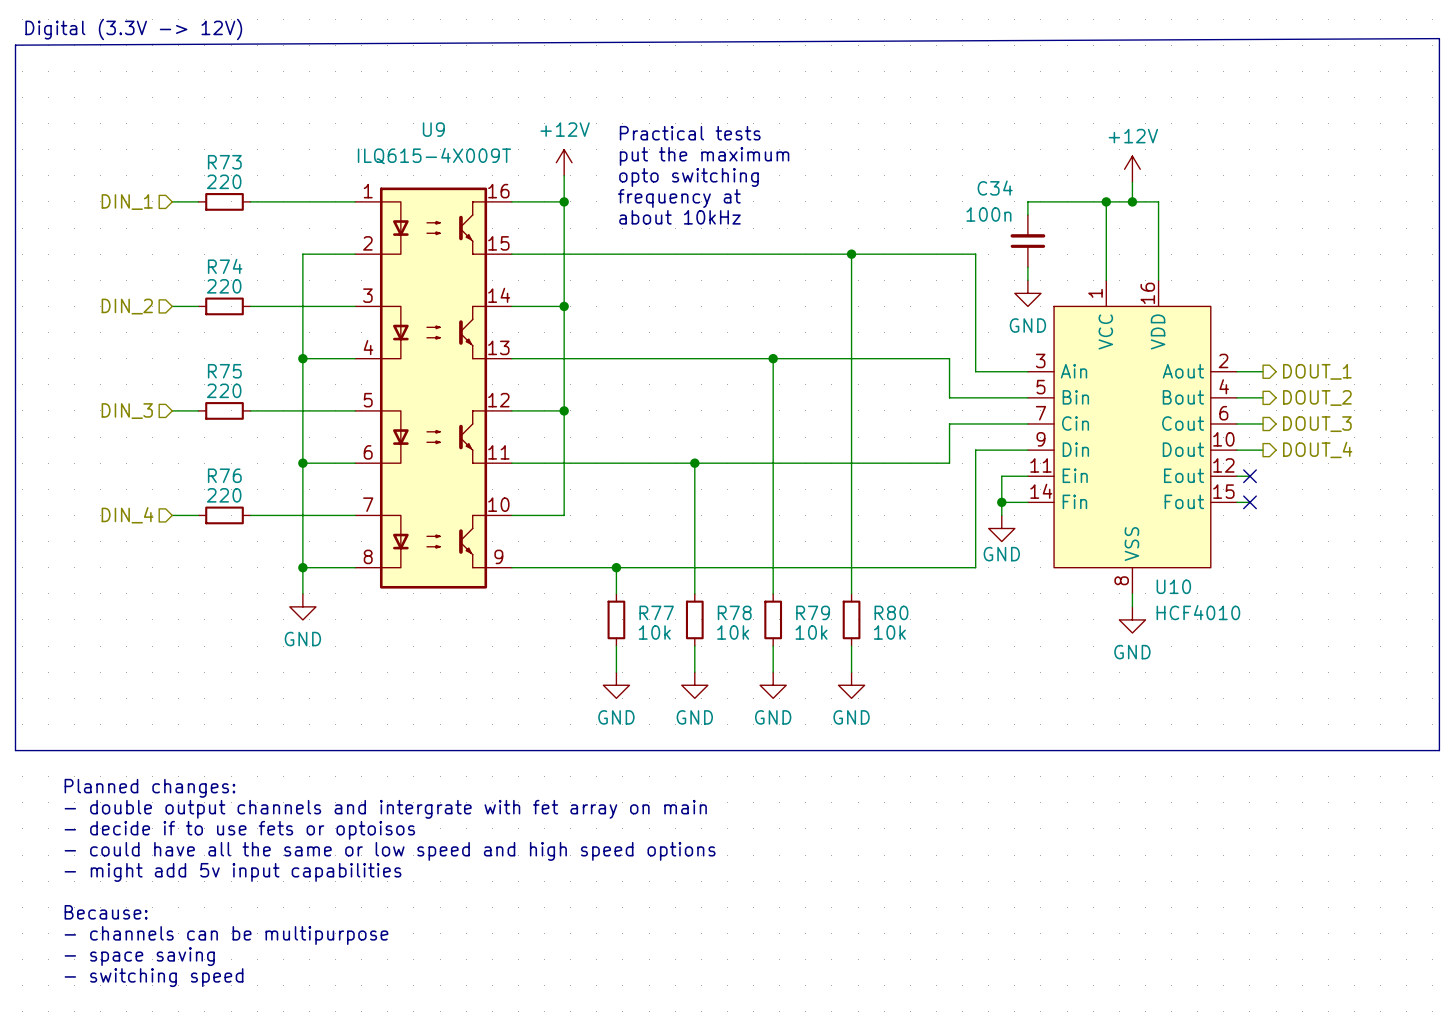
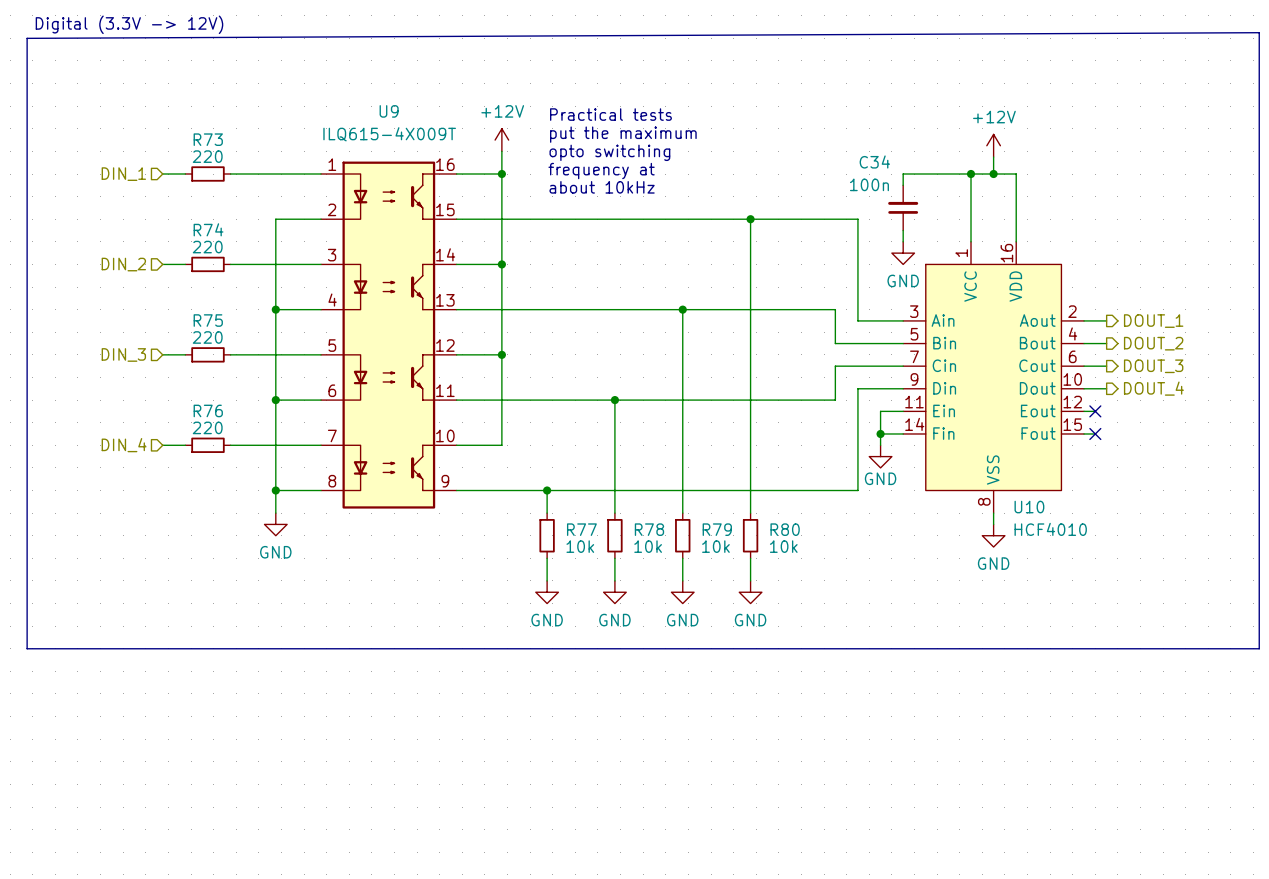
text: Planned changes: (149, 788) -> none
text: - double output channels and intergrate with fet array on main (385, 809) -> none
text: - decide if to use fets or optoisos (239, 830) -> none
text: - could have all the same or low speed and high speed options (390, 851) -> none
text: - might add 5v input capabilities (233, 872) -> none
text: Because: (106, 912) -> none
text: - channels can be multipurpose (226, 935) -> none
text: - space saving (139, 956) -> none
text: - switching speed (154, 977) -> none

